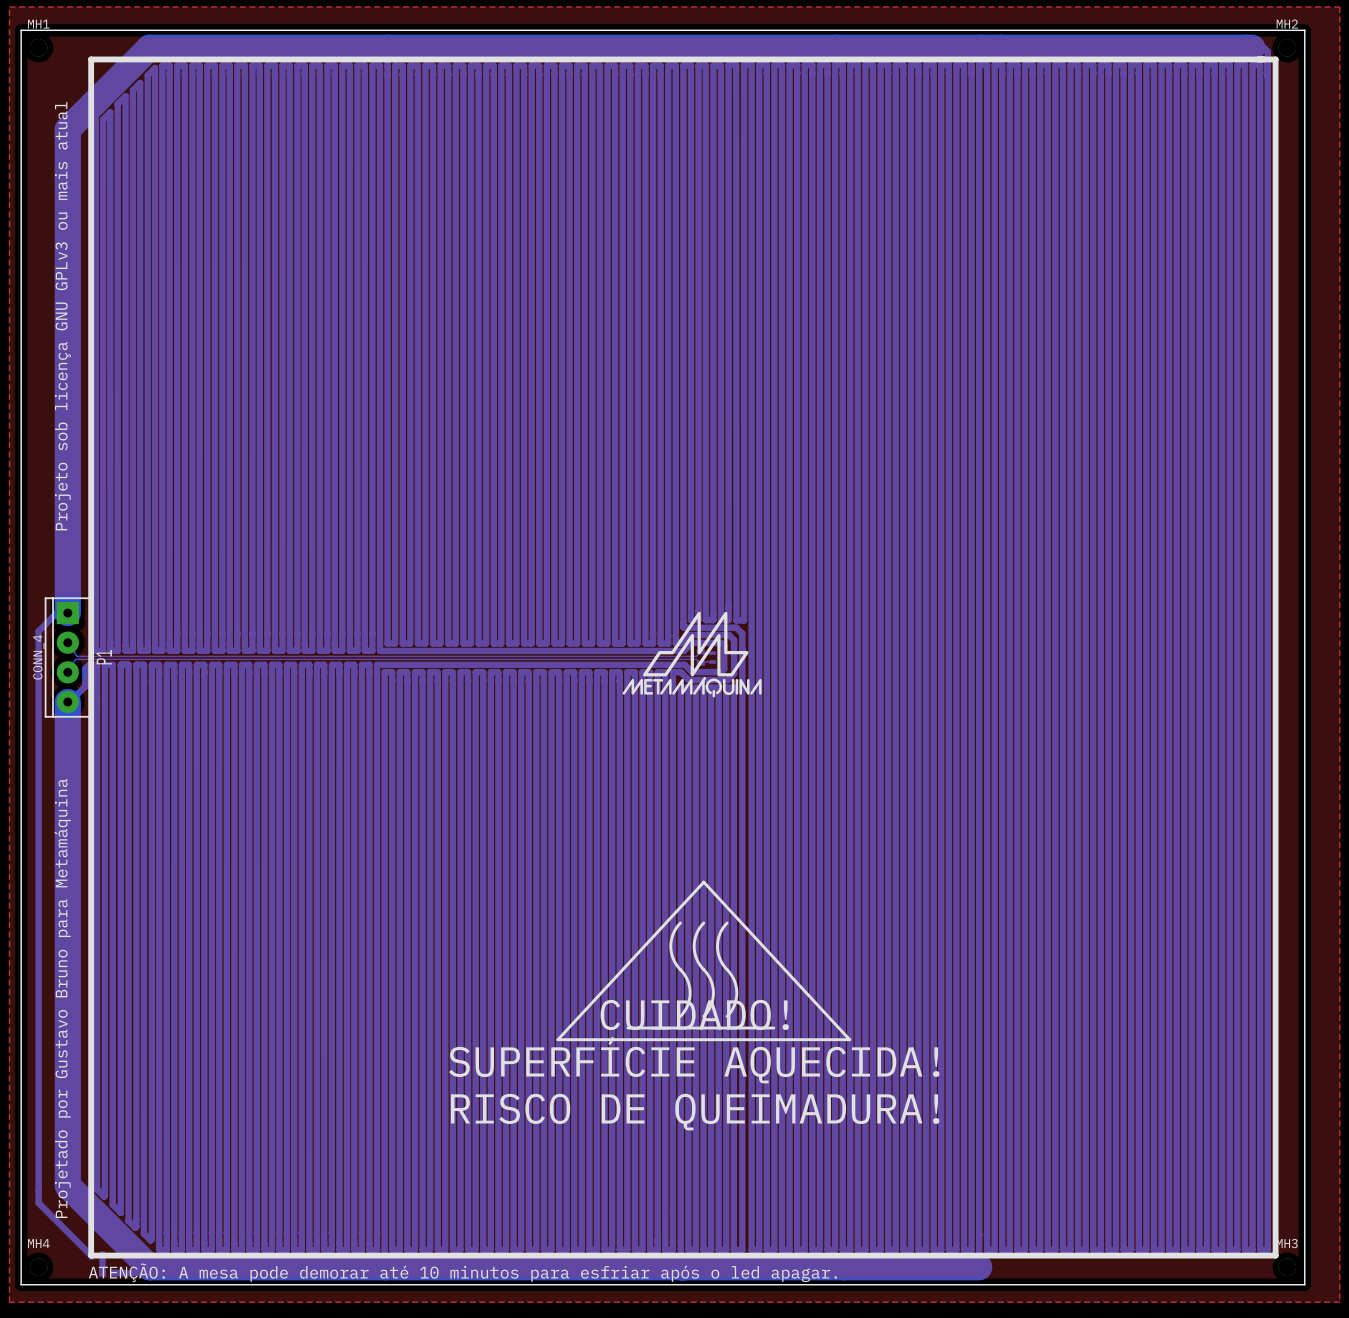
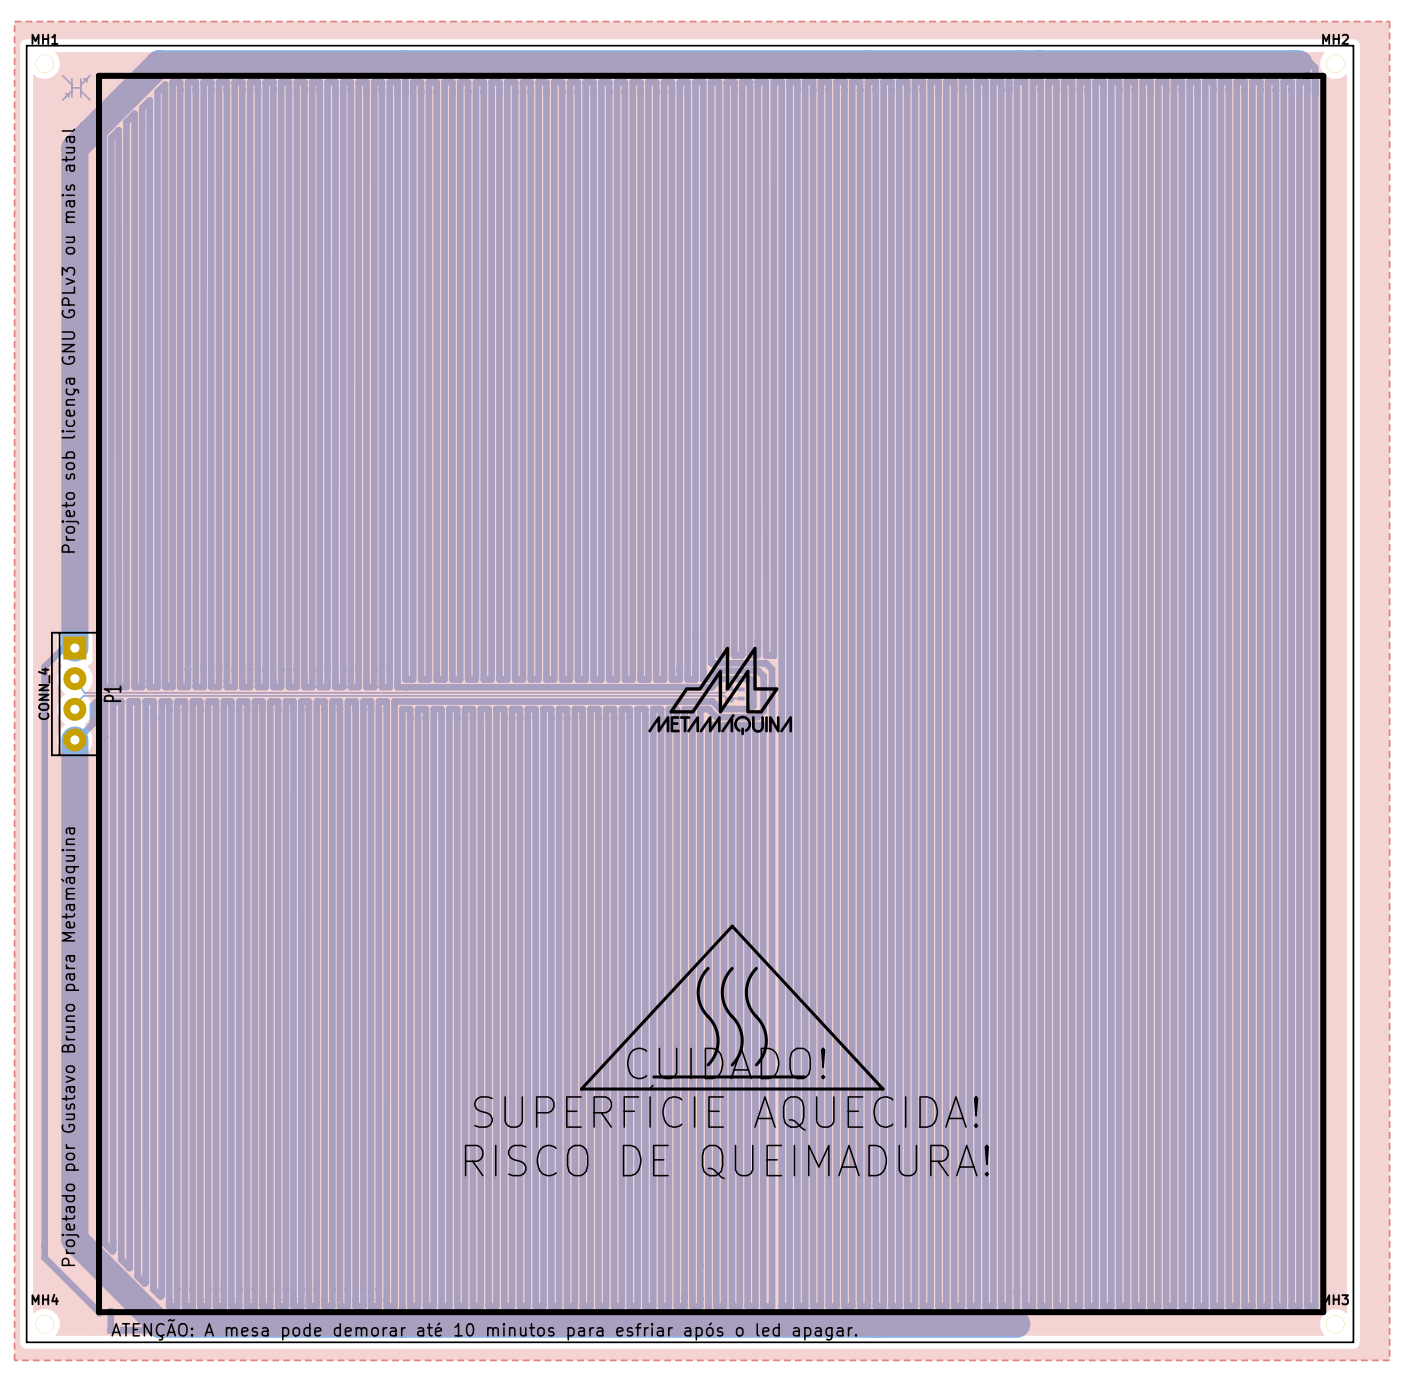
bottom track: none -> (62, 75) (71, 84)
bottom track: none -> (89, 75) (80, 84)
bottom track: none -> (71, 78) (71, 96)
bottom track: none -> (80, 78) (80, 96)
bottom track: none -> (83, 78) (86, 78) (86, 81)
bottom track: none -> (71, 87) (80, 87)
bottom track: none -> (71, 90) (62, 99)
bottom track: none -> (80, 90) (89, 99)
bottom track: none -> (65, 93) (68, 93) (68, 96)

